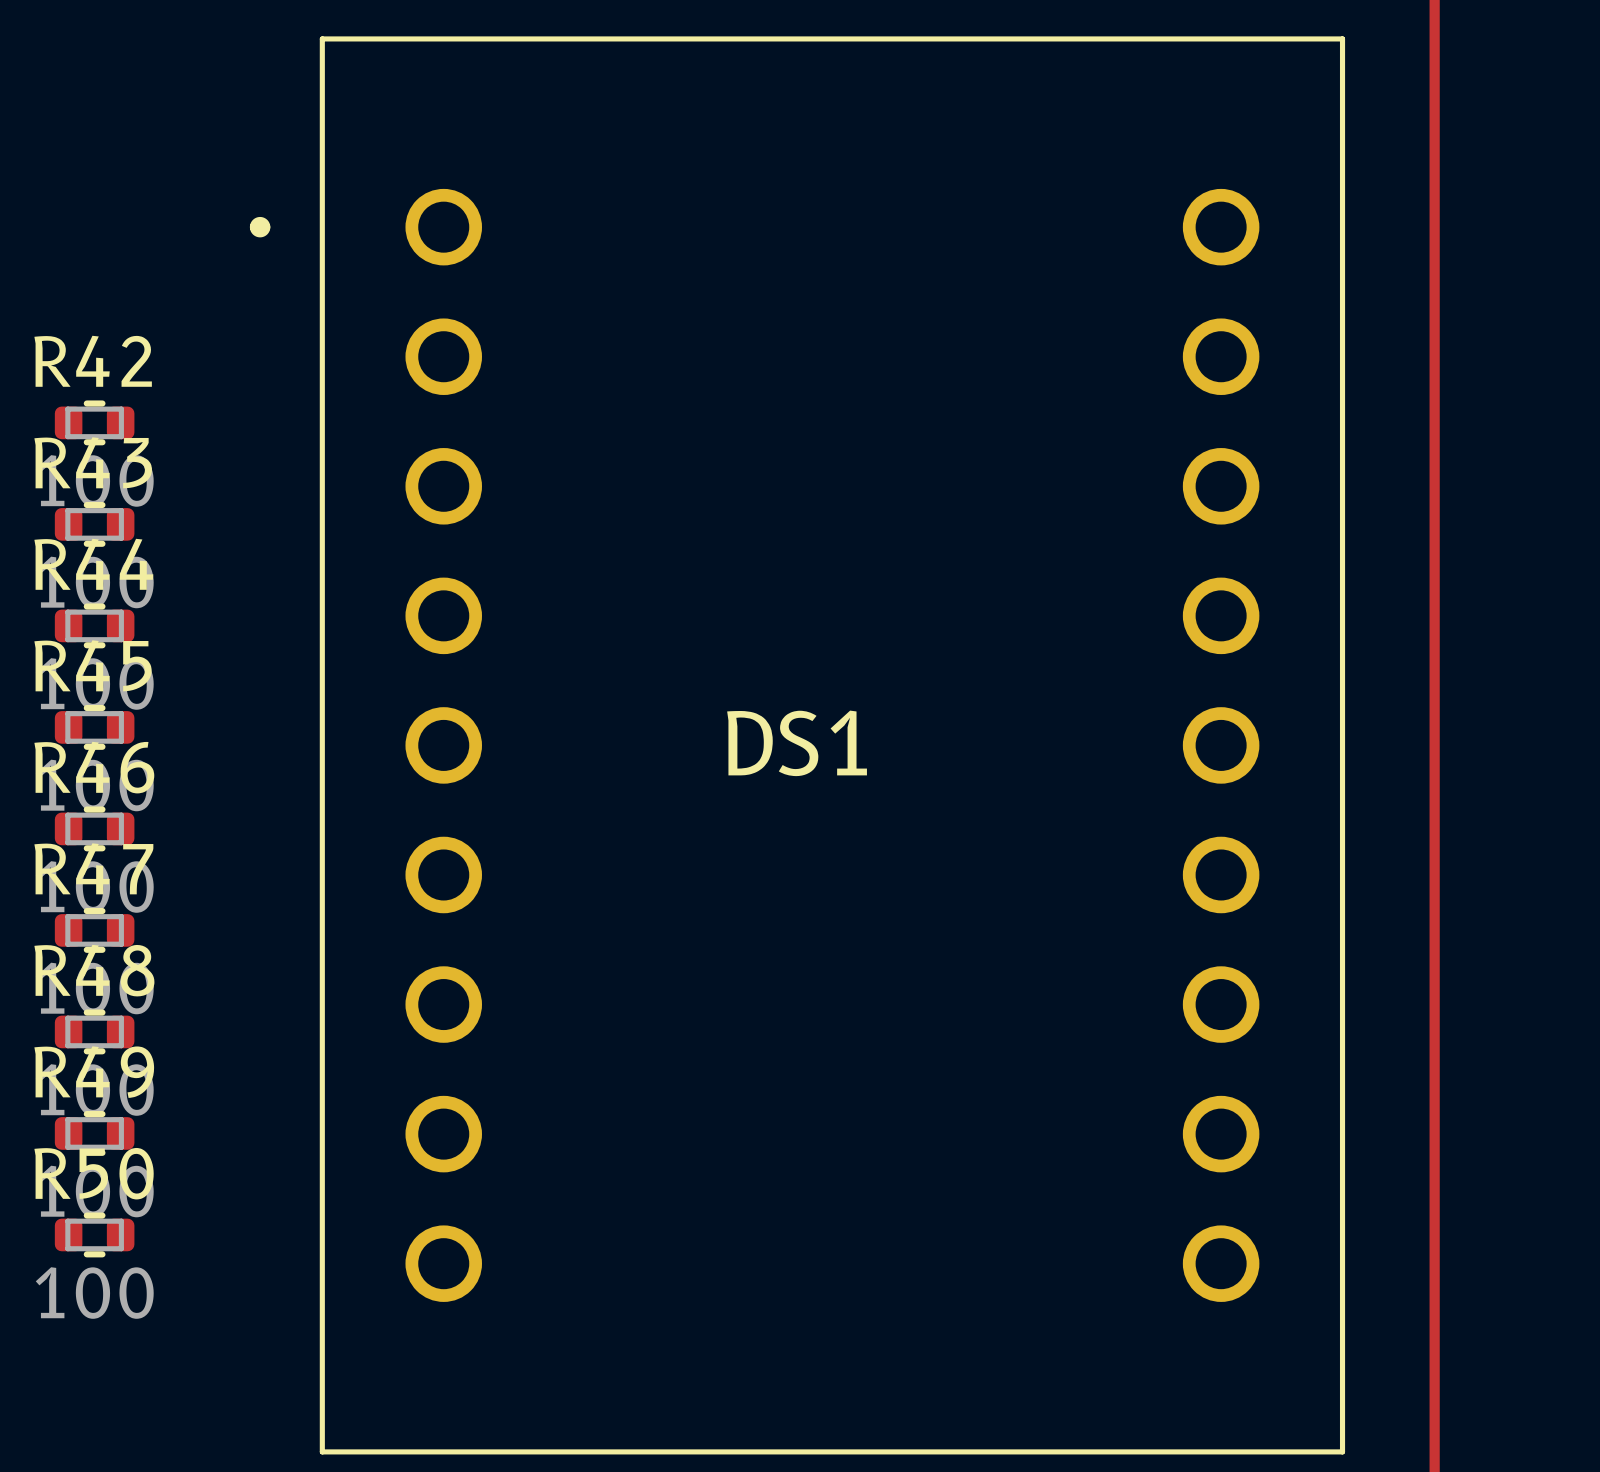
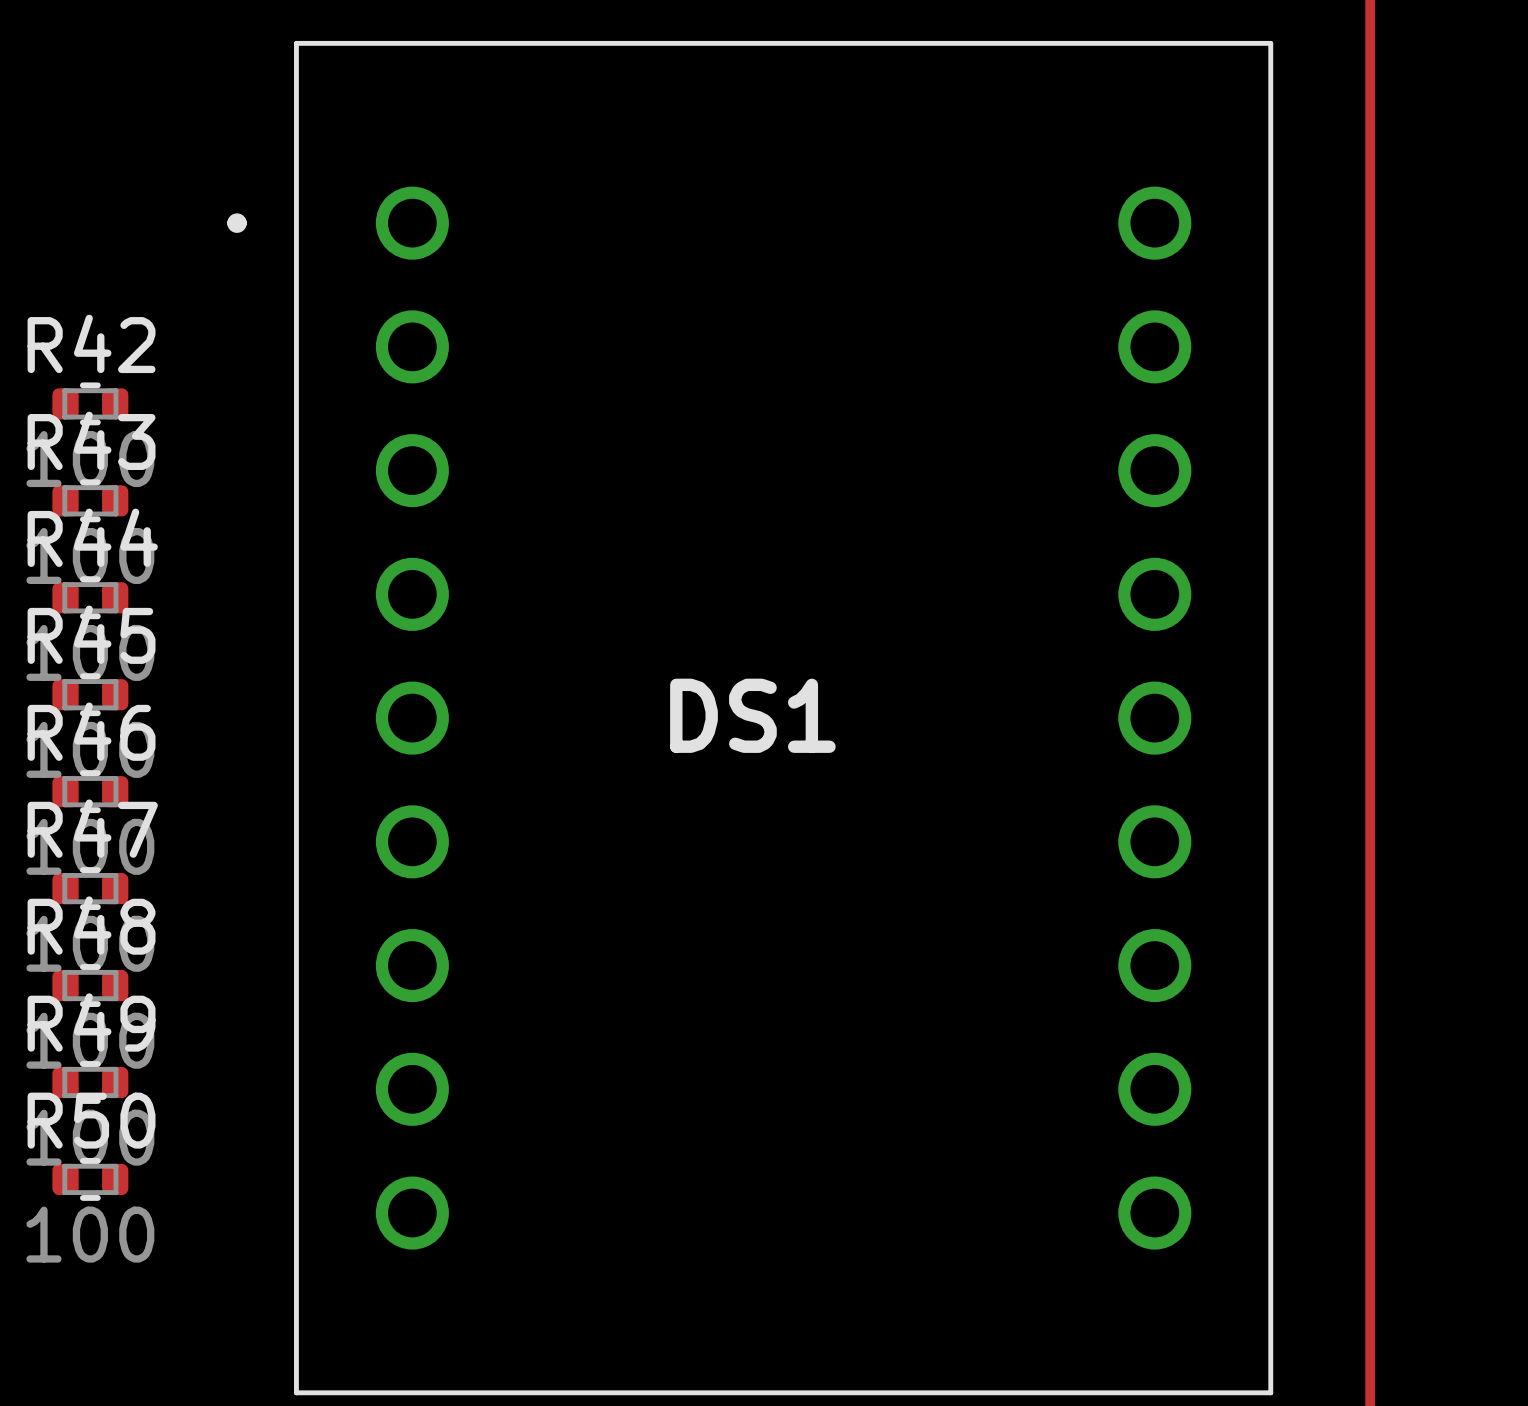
DS1 position: (797, 745) -> (750, 718)

